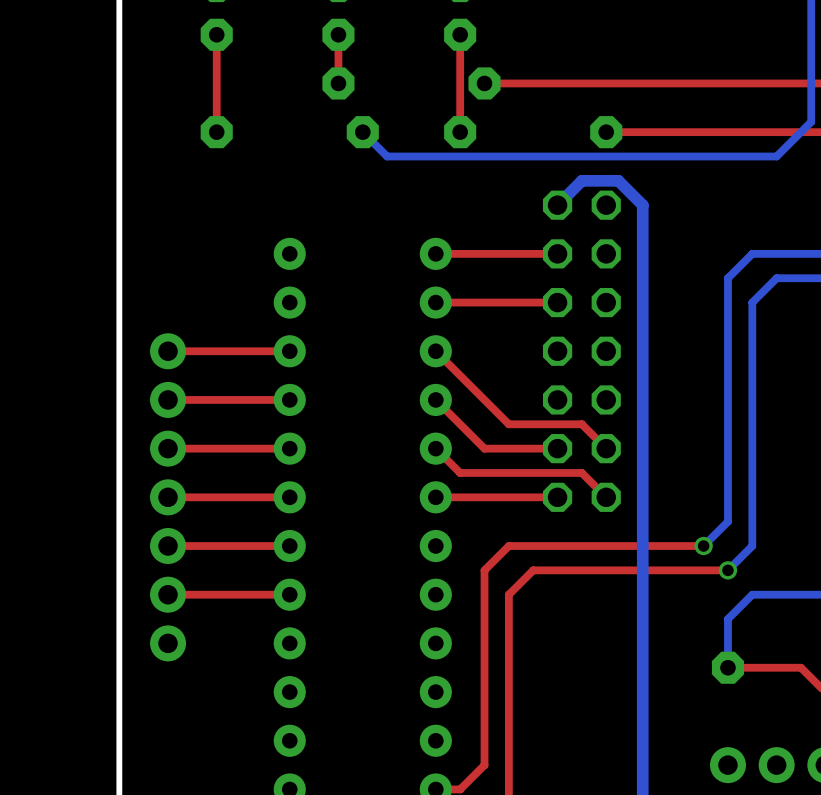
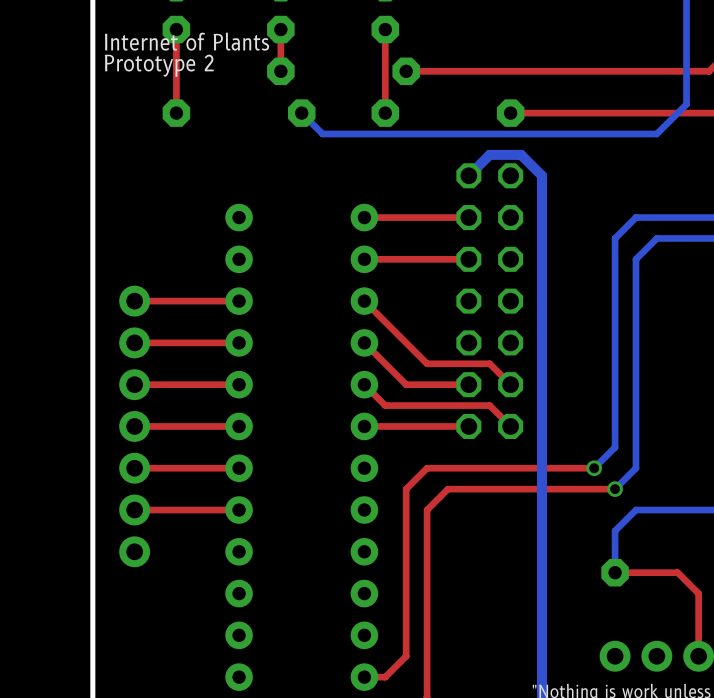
text: none -> Internet of Plants (186, 41)
text: none -> Prototype 2 (159, 65)

